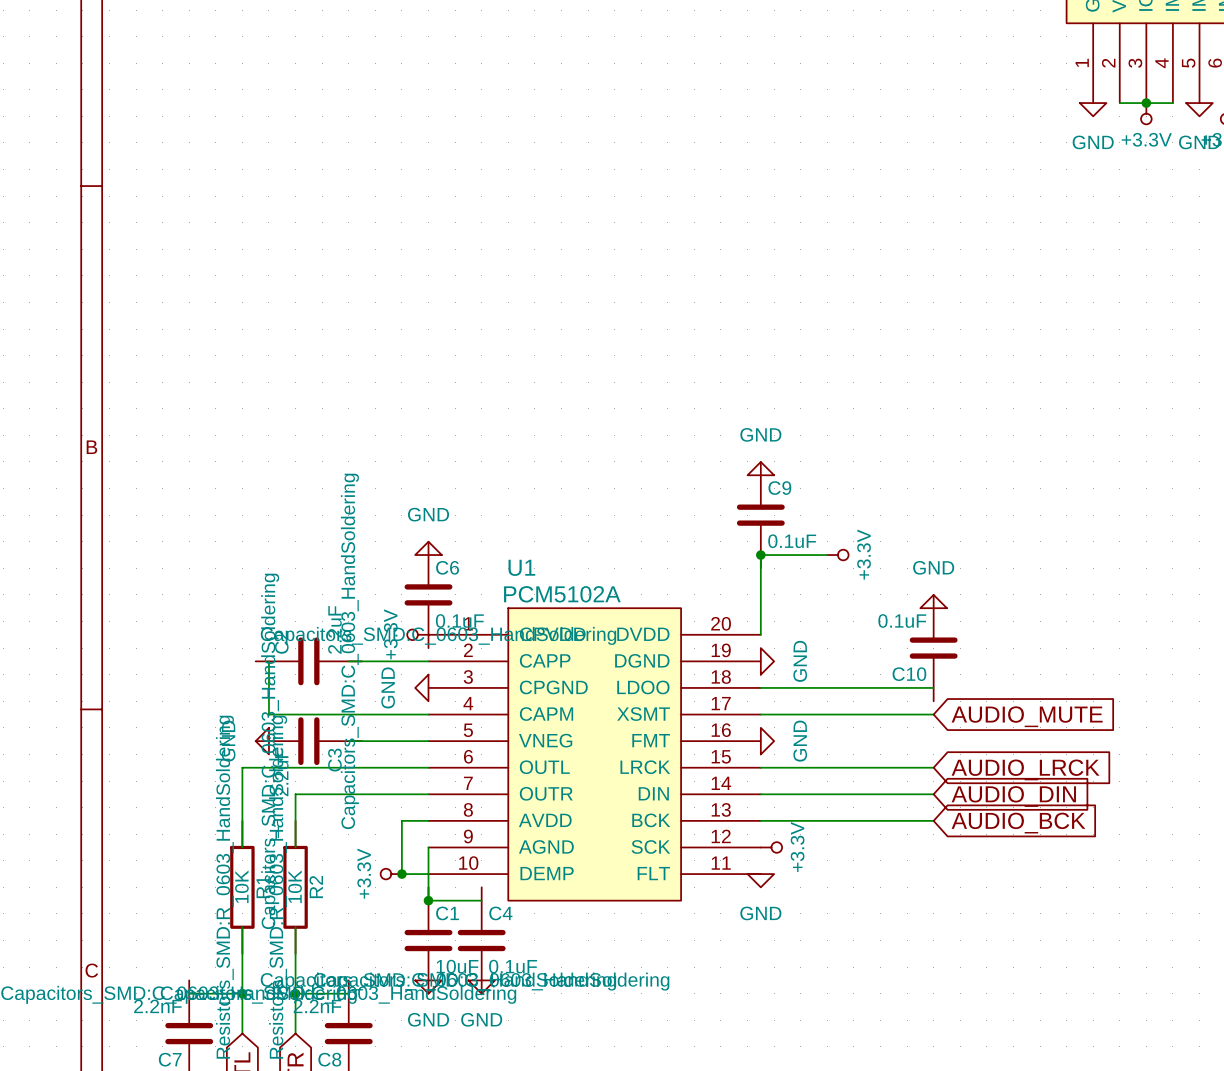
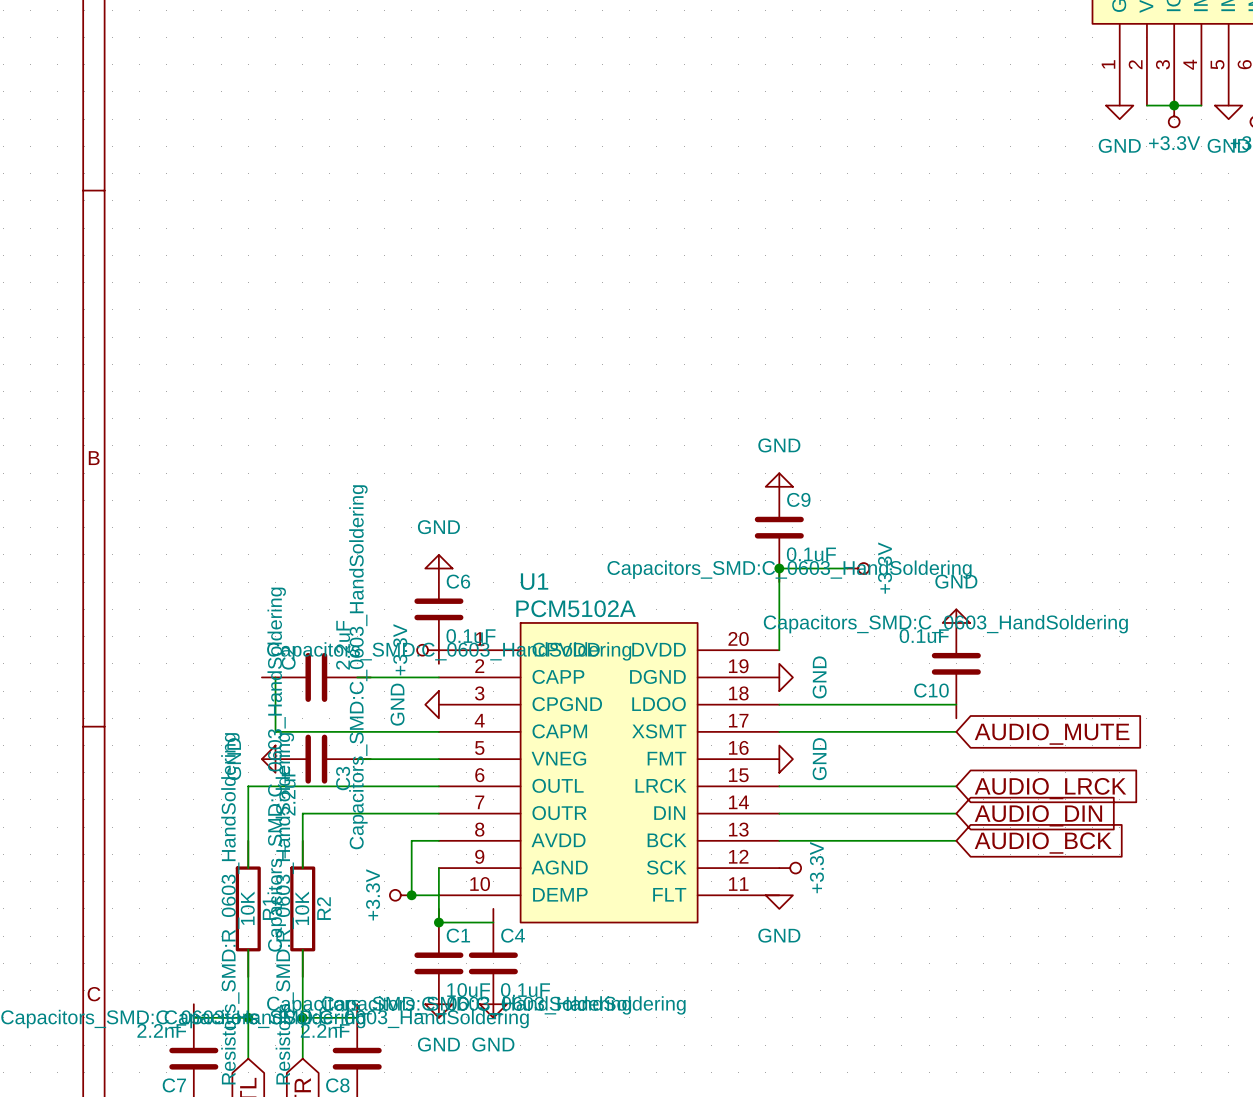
C9 text: none -> Capacitors_SMD:C_0603_HandSoldering (789, 569)
C10 text: none -> Capacitors_SMD:C_0603_HandSoldering (945, 624)

